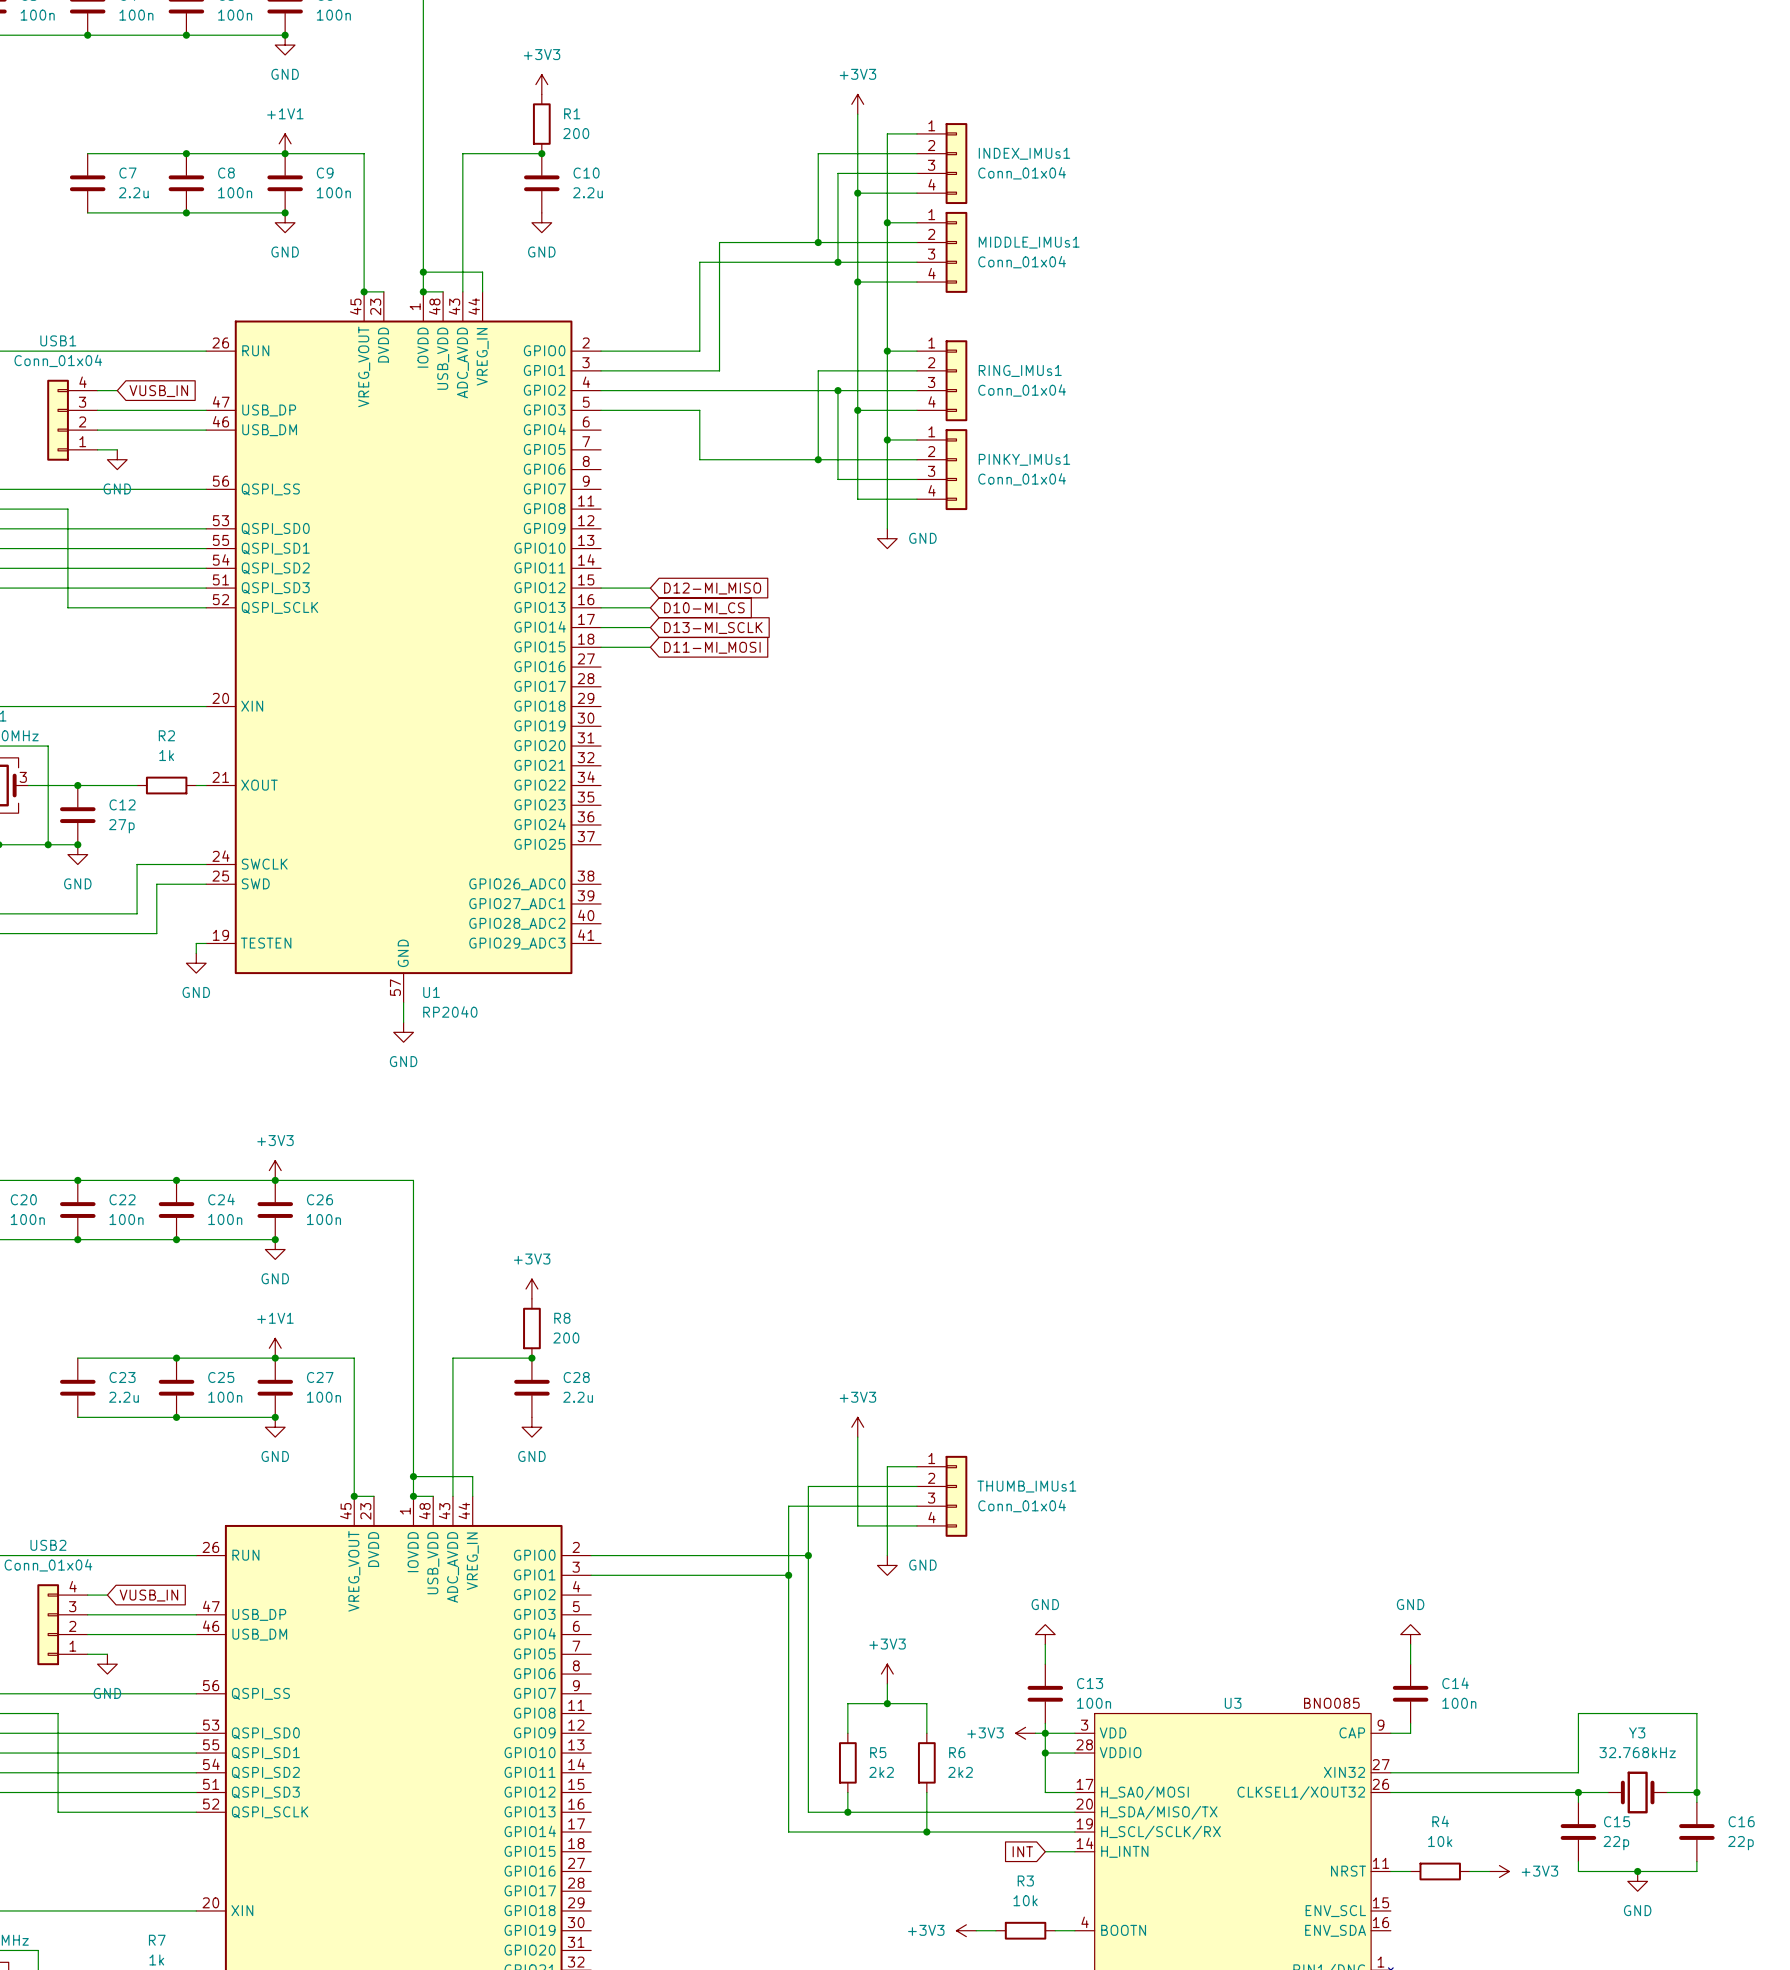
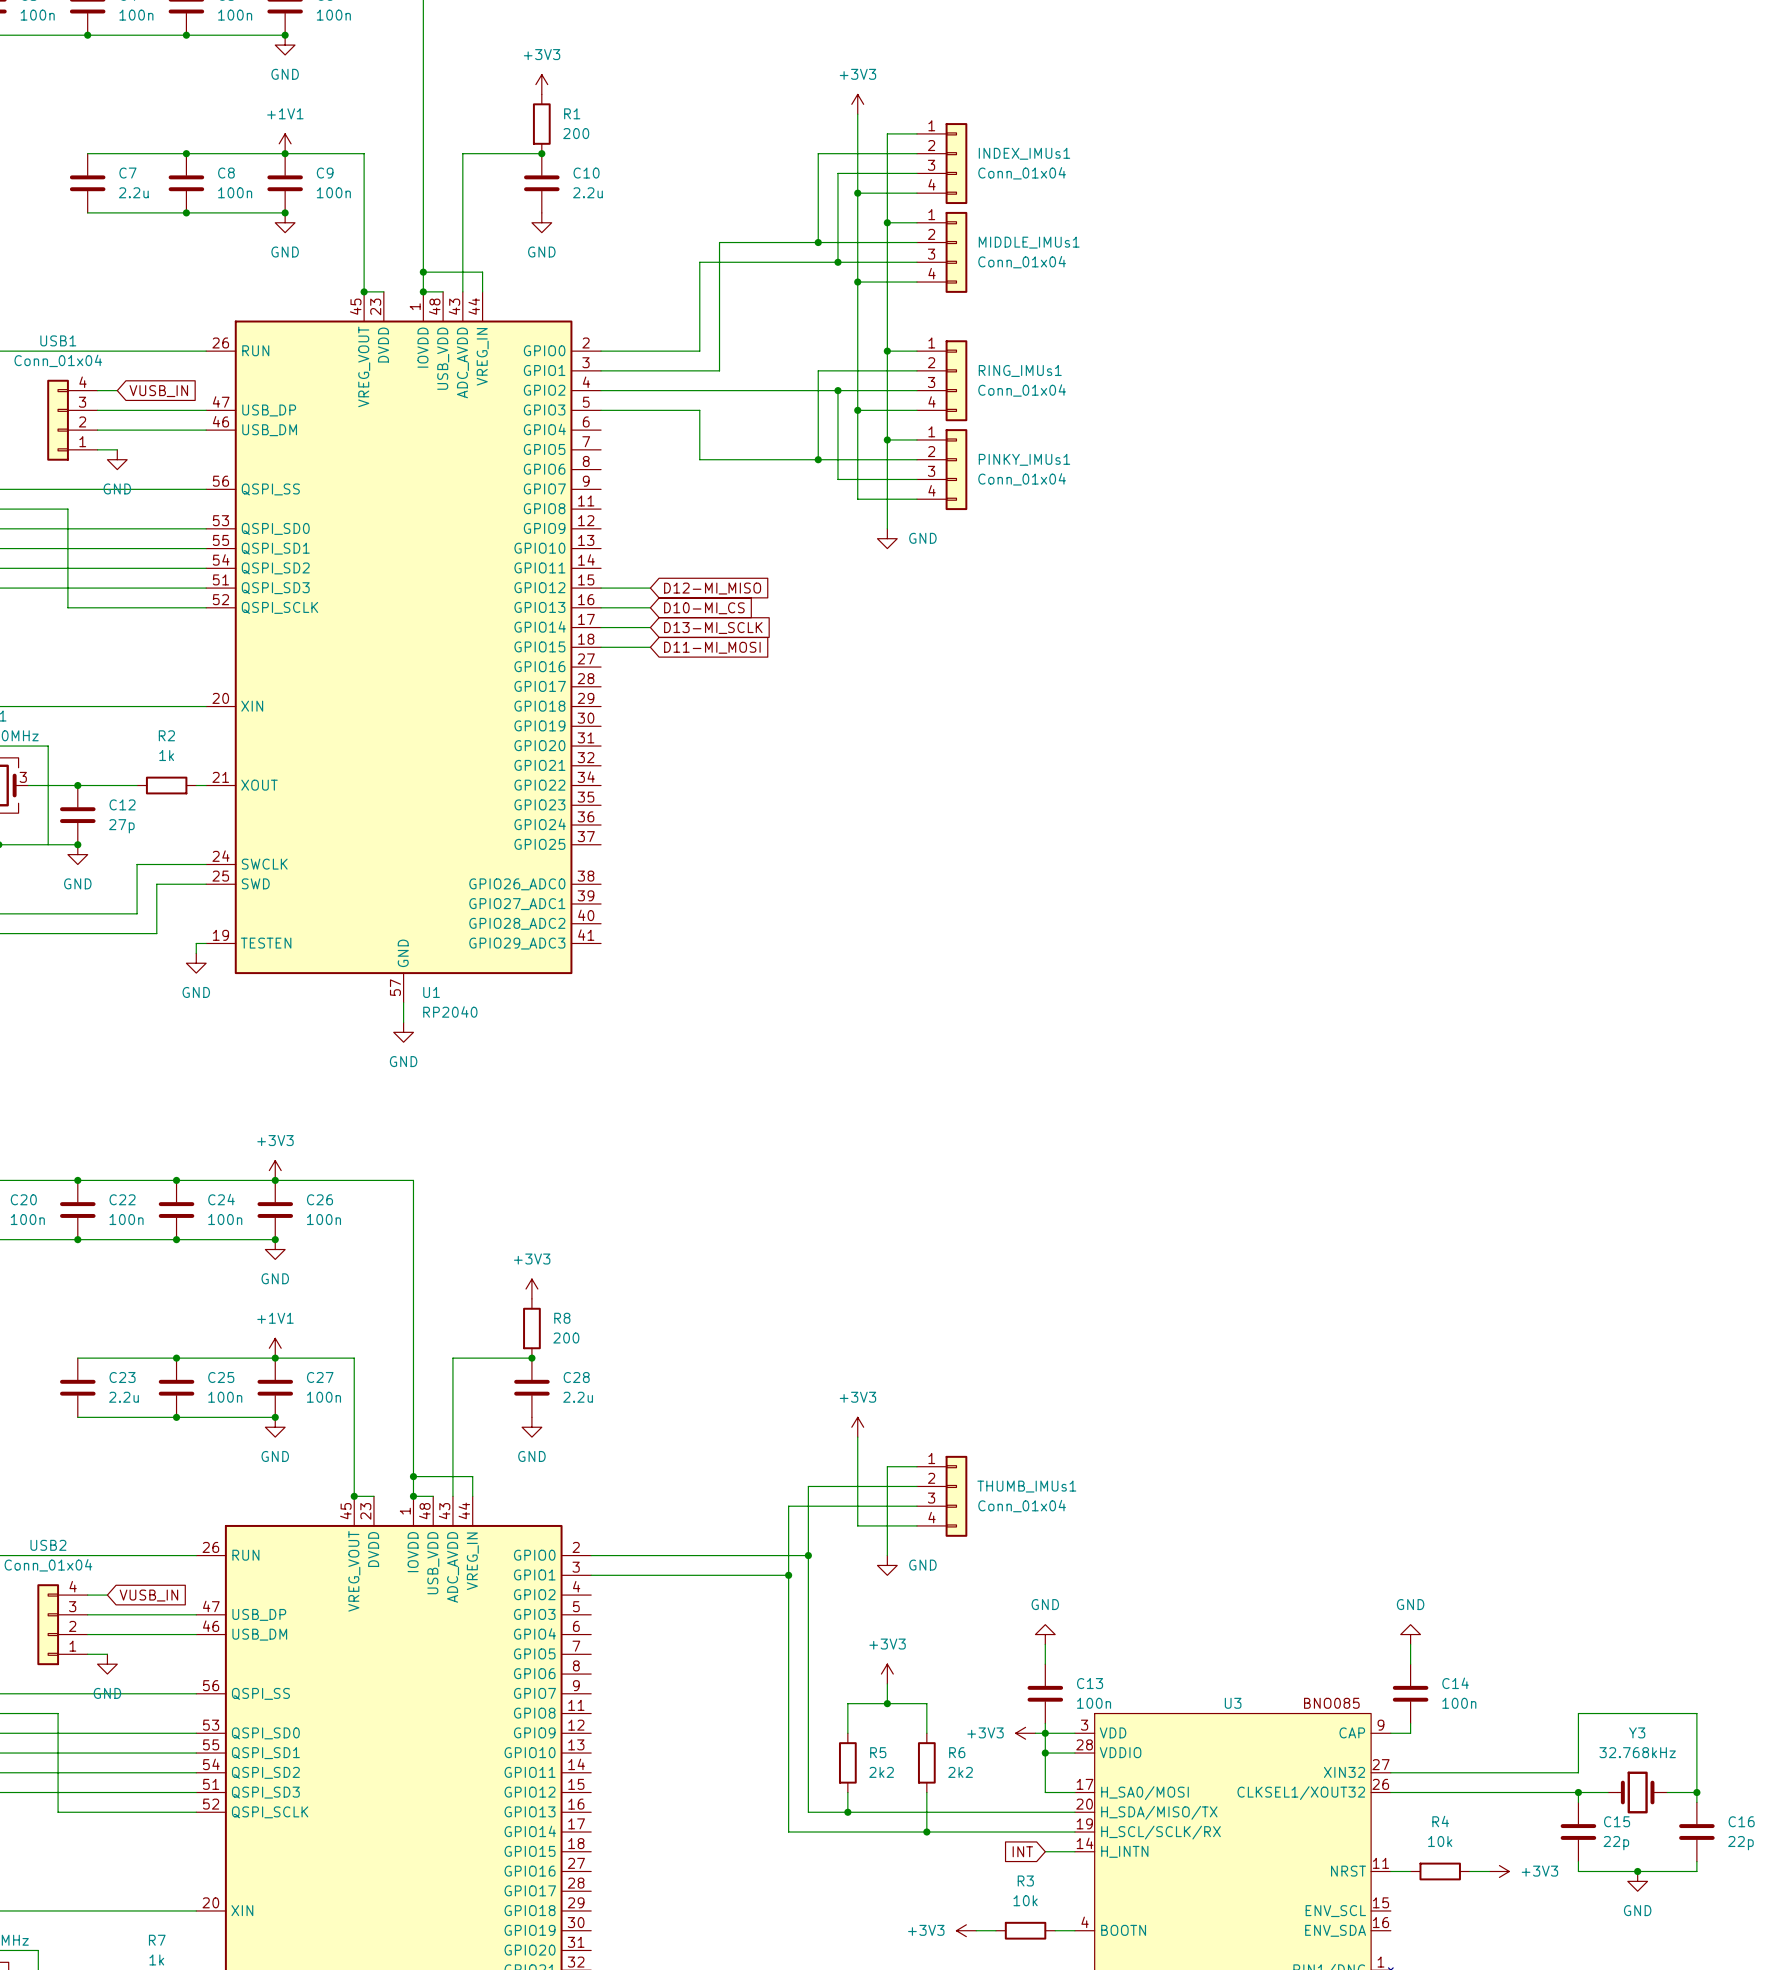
junction: (48, 844) -> none

